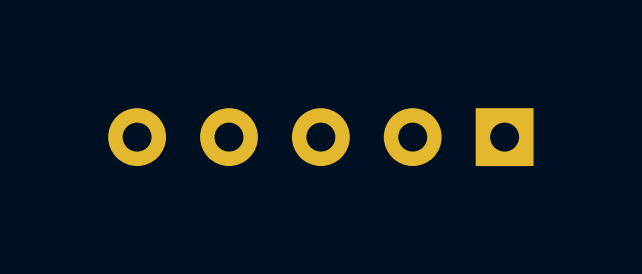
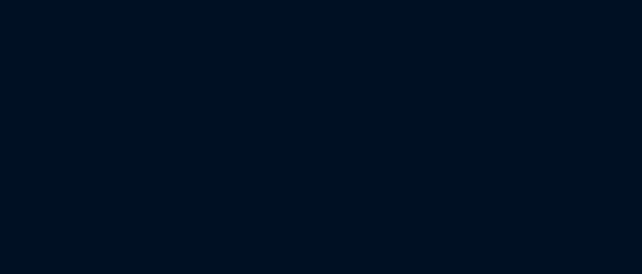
part: (320, 137) -> none

